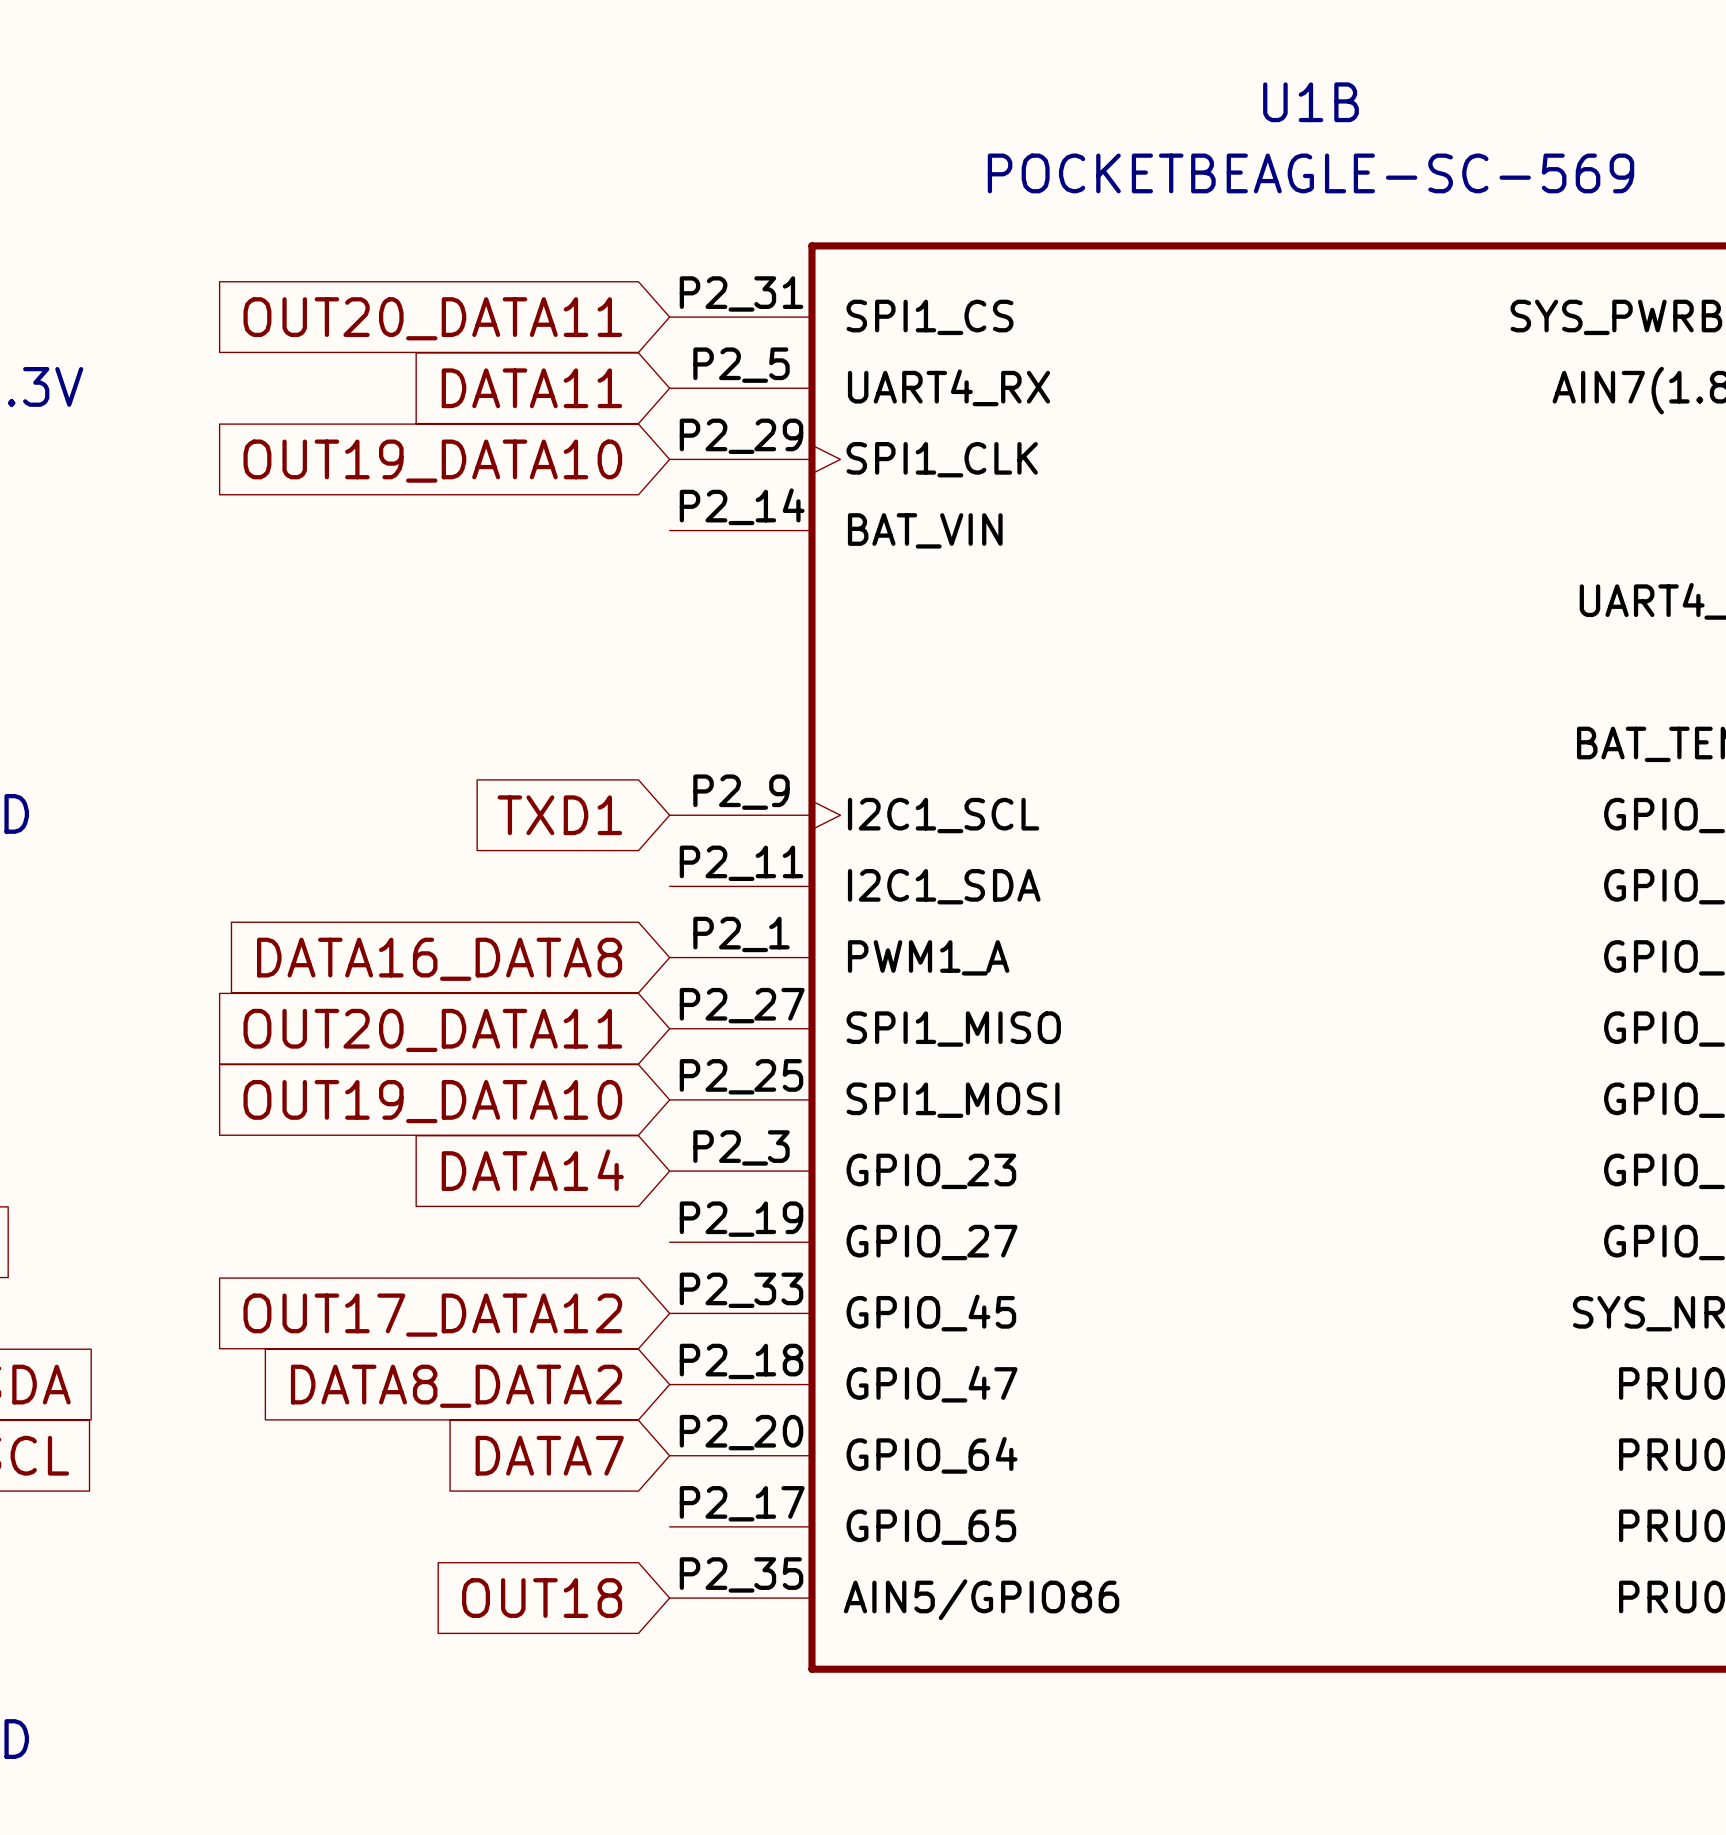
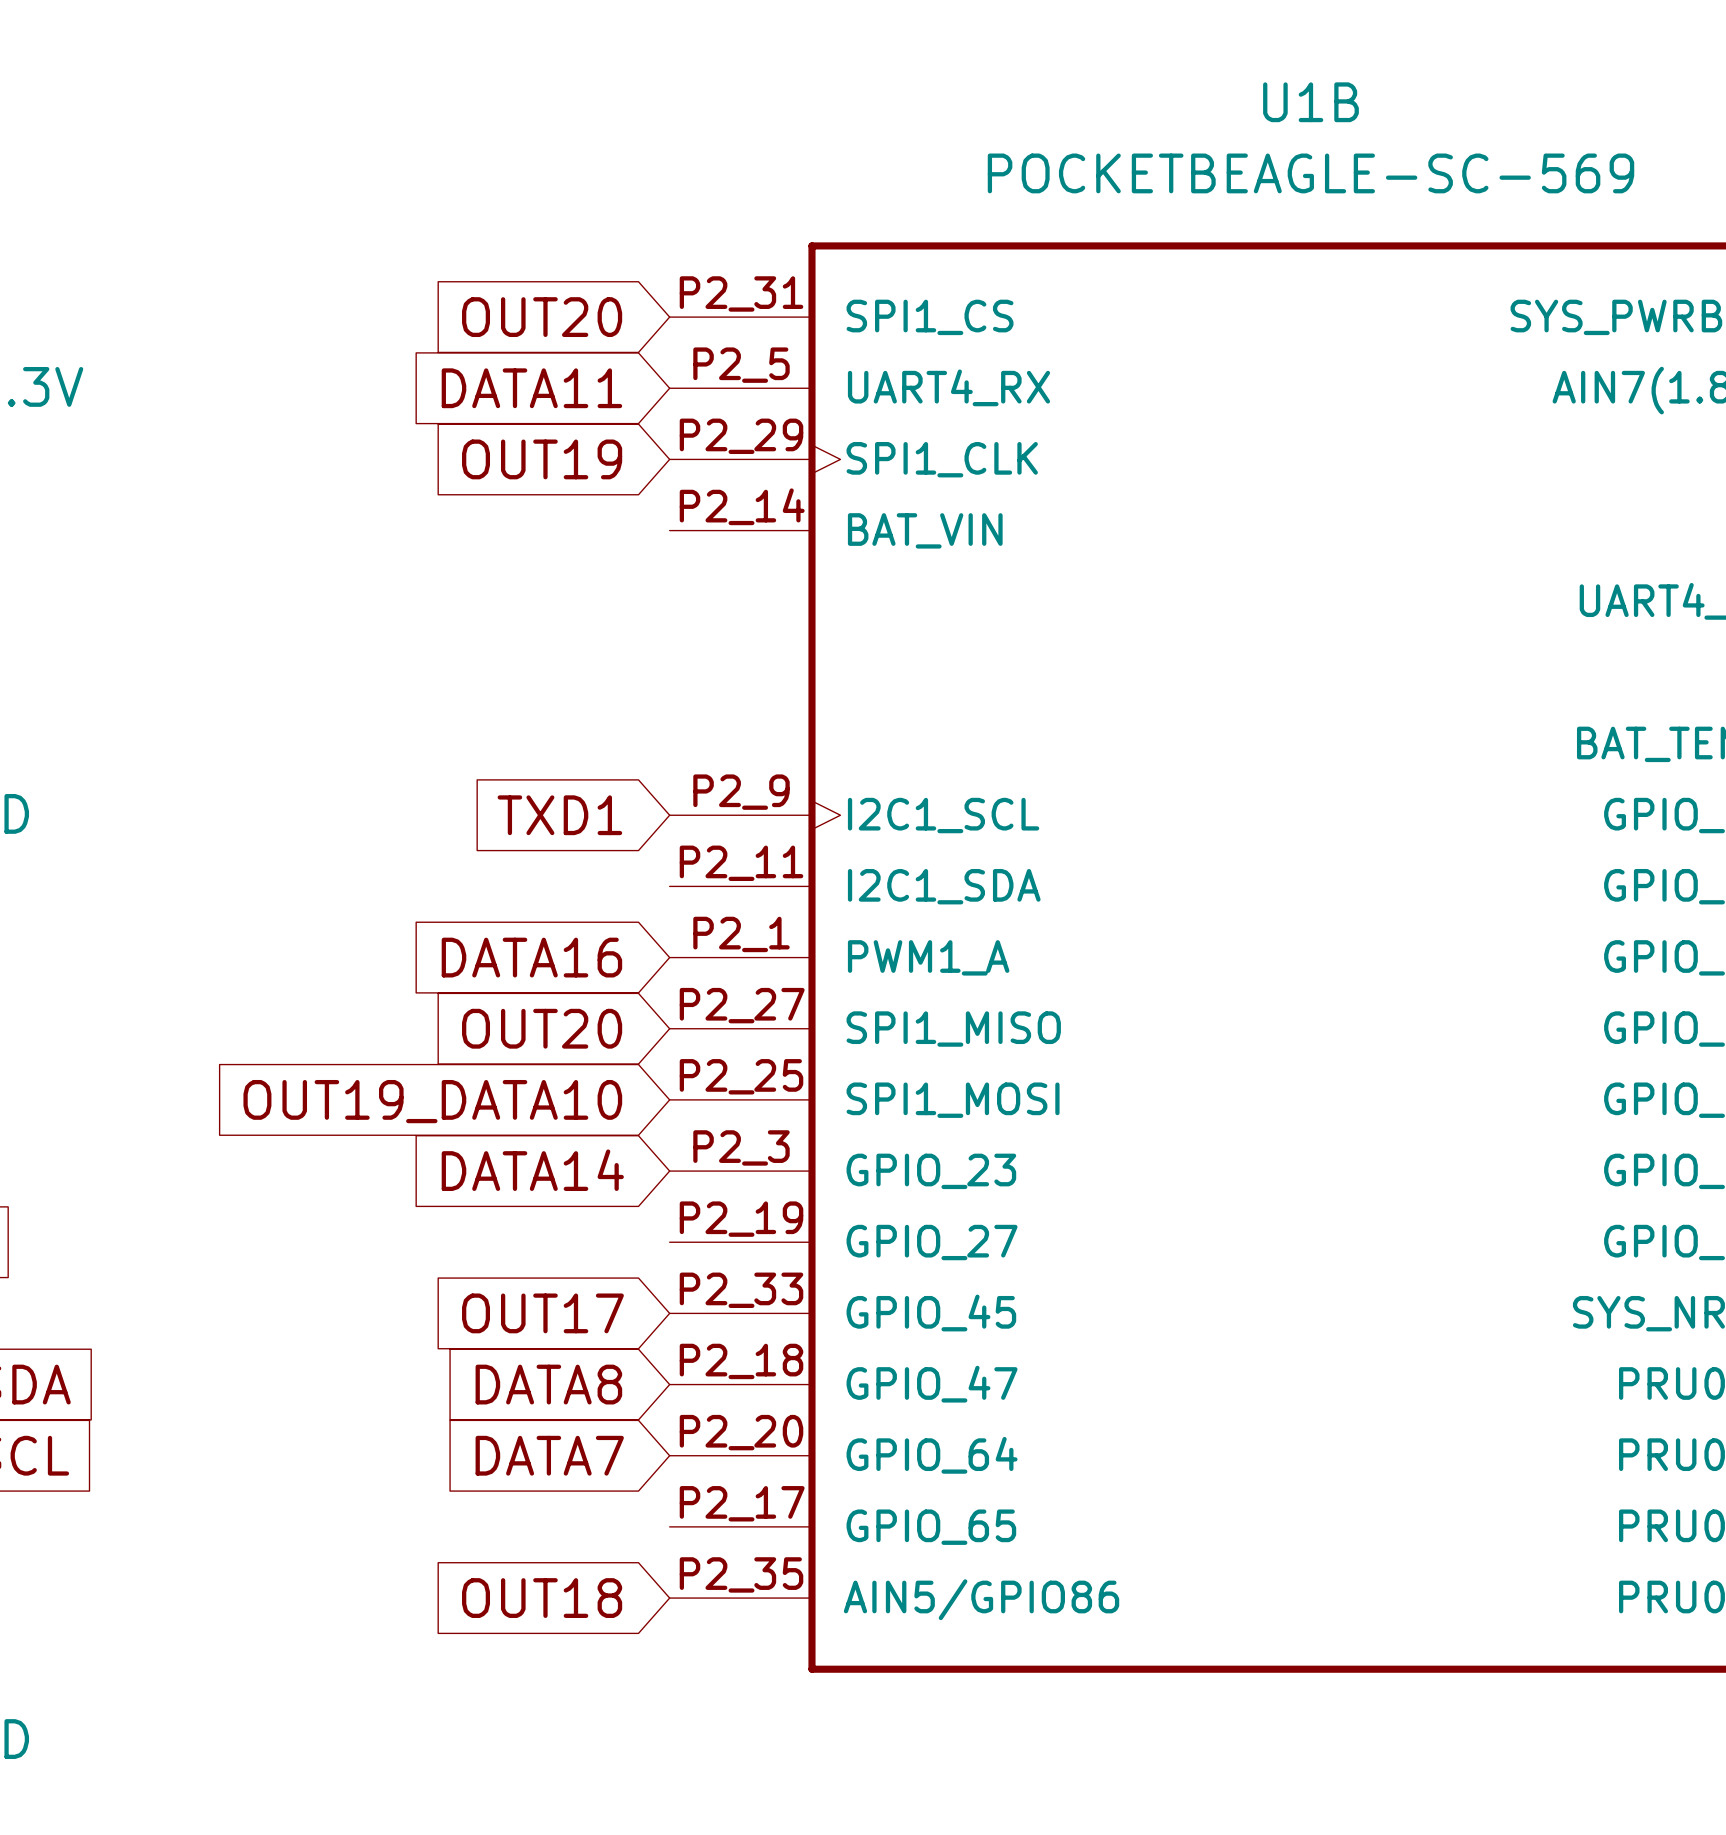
global label: OUT20_DATA11 (432, 318) -> OUT20 (542, 317)
global label: OUT19_DATA10 (432, 461) -> OUT19 (542, 459)
global label: DATA16_DATA8 (439, 959) -> DATA16 (531, 957)
global label: OUT20_DATA11 (432, 1030) -> OUT20 (542, 1028)
global label: OUT17_DATA12 (432, 1315) -> OUT17 (542, 1313)
global label: DATA8_DATA2 (456, 1386) -> DATA8 (548, 1384)

